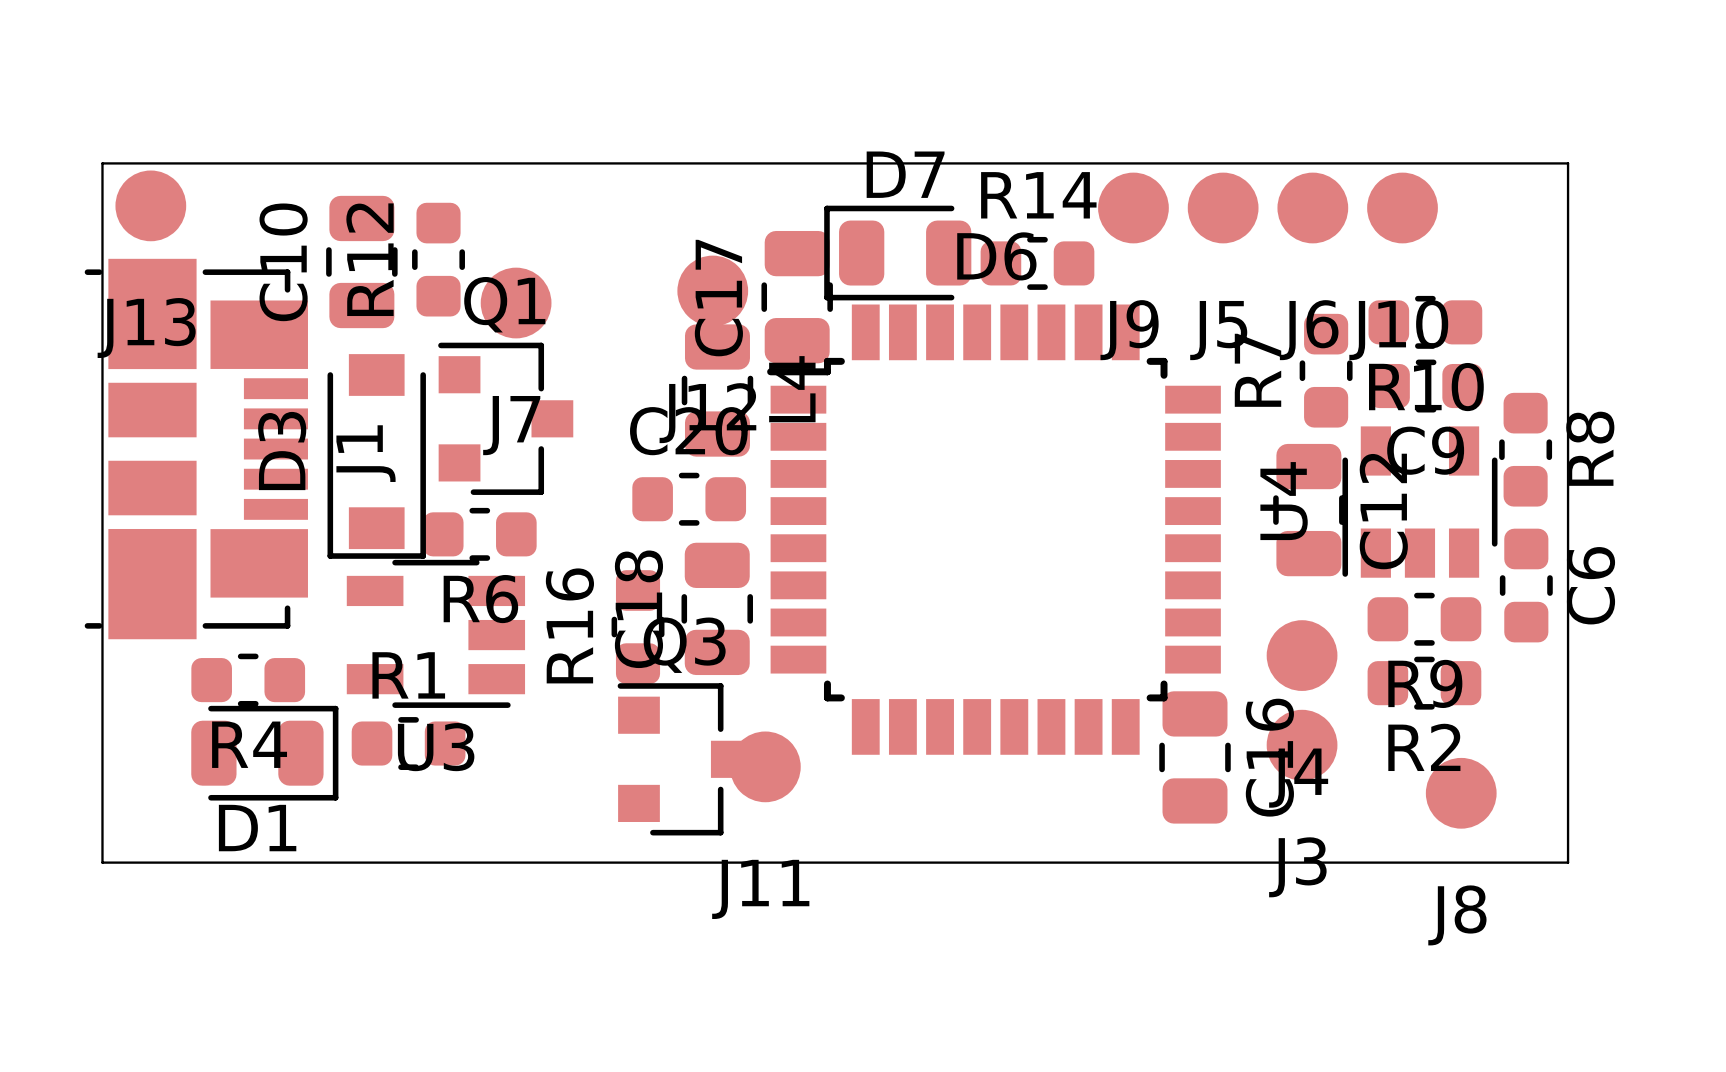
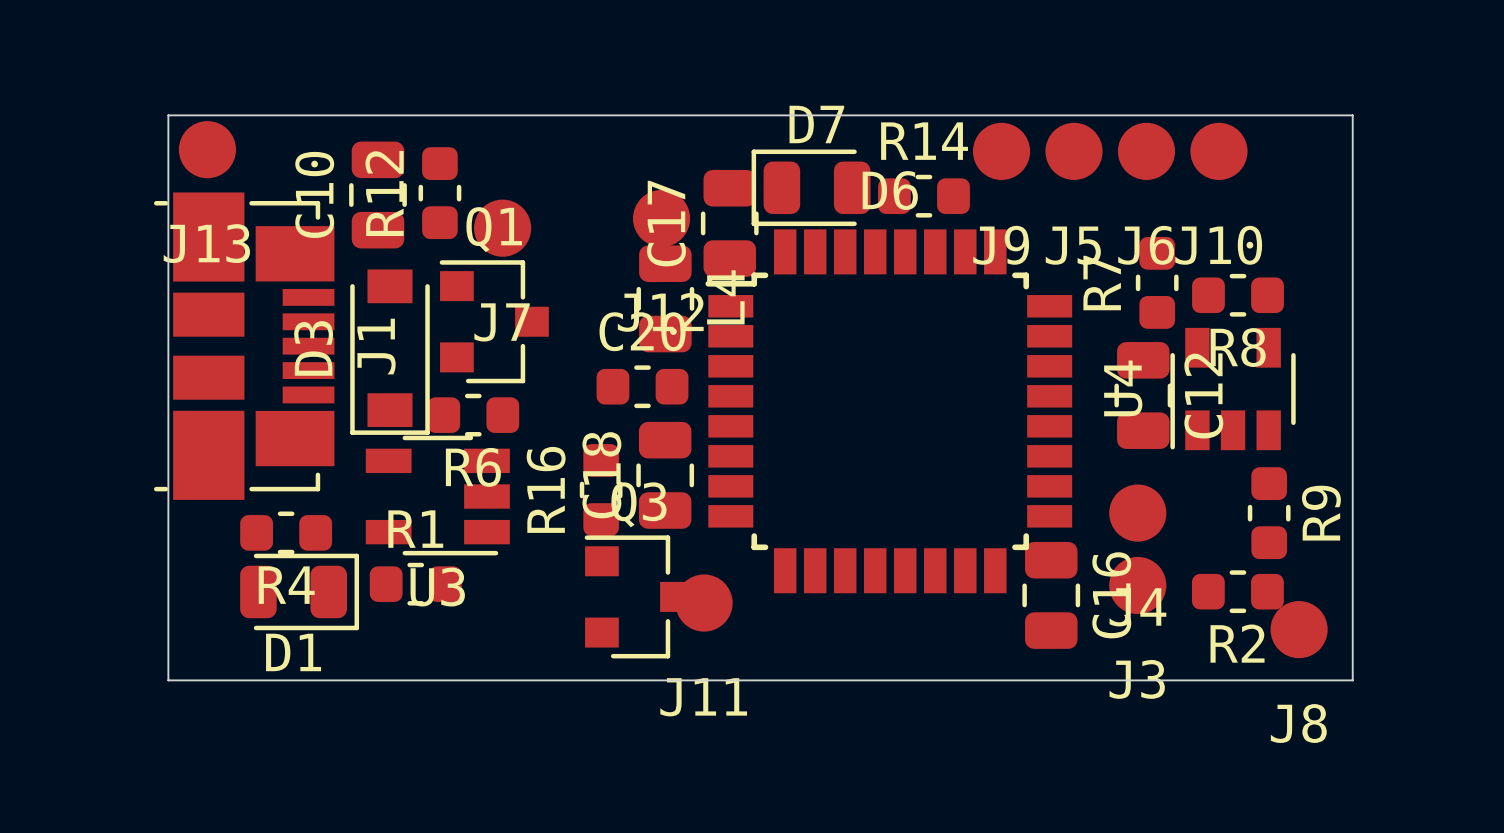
R10: (1425, 322) -> none
R8: (1525, 449) -> none
C9 name: C9 (1425, 450) -> R8 (1238, 347)
C6: (1526, 585) -> none
R9 rotation: 0° (1424, 619) -> 90° clockwise (1269, 513)
R2 position: (1424, 683) -> (1237, 591)
R9 name position: R9 (1425, 683) -> R9 (1321, 513)
J8 position: (1461, 793) -> (1299, 629)

